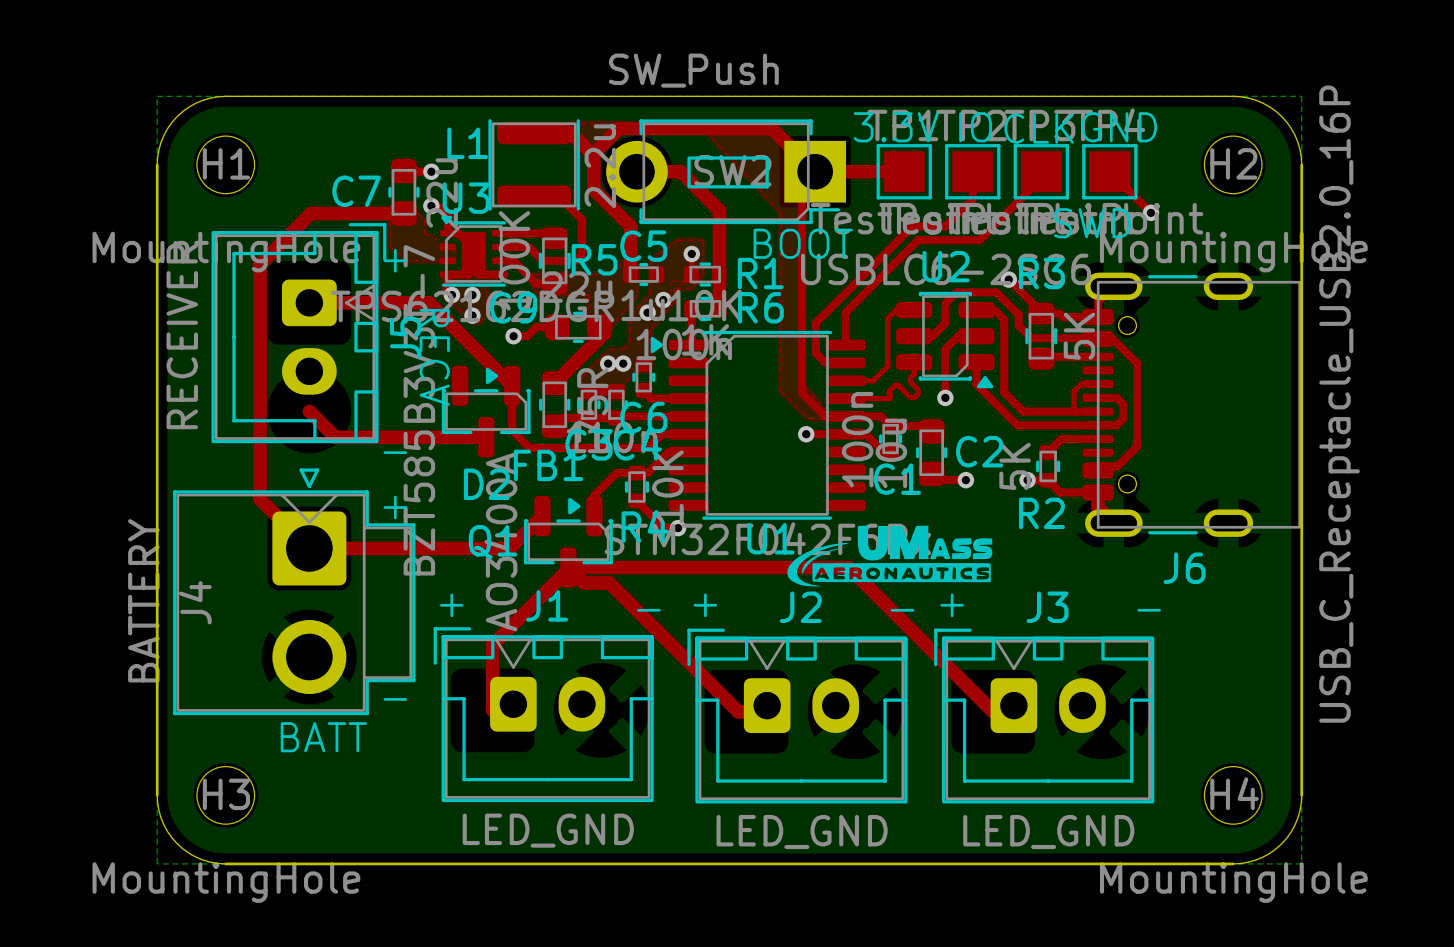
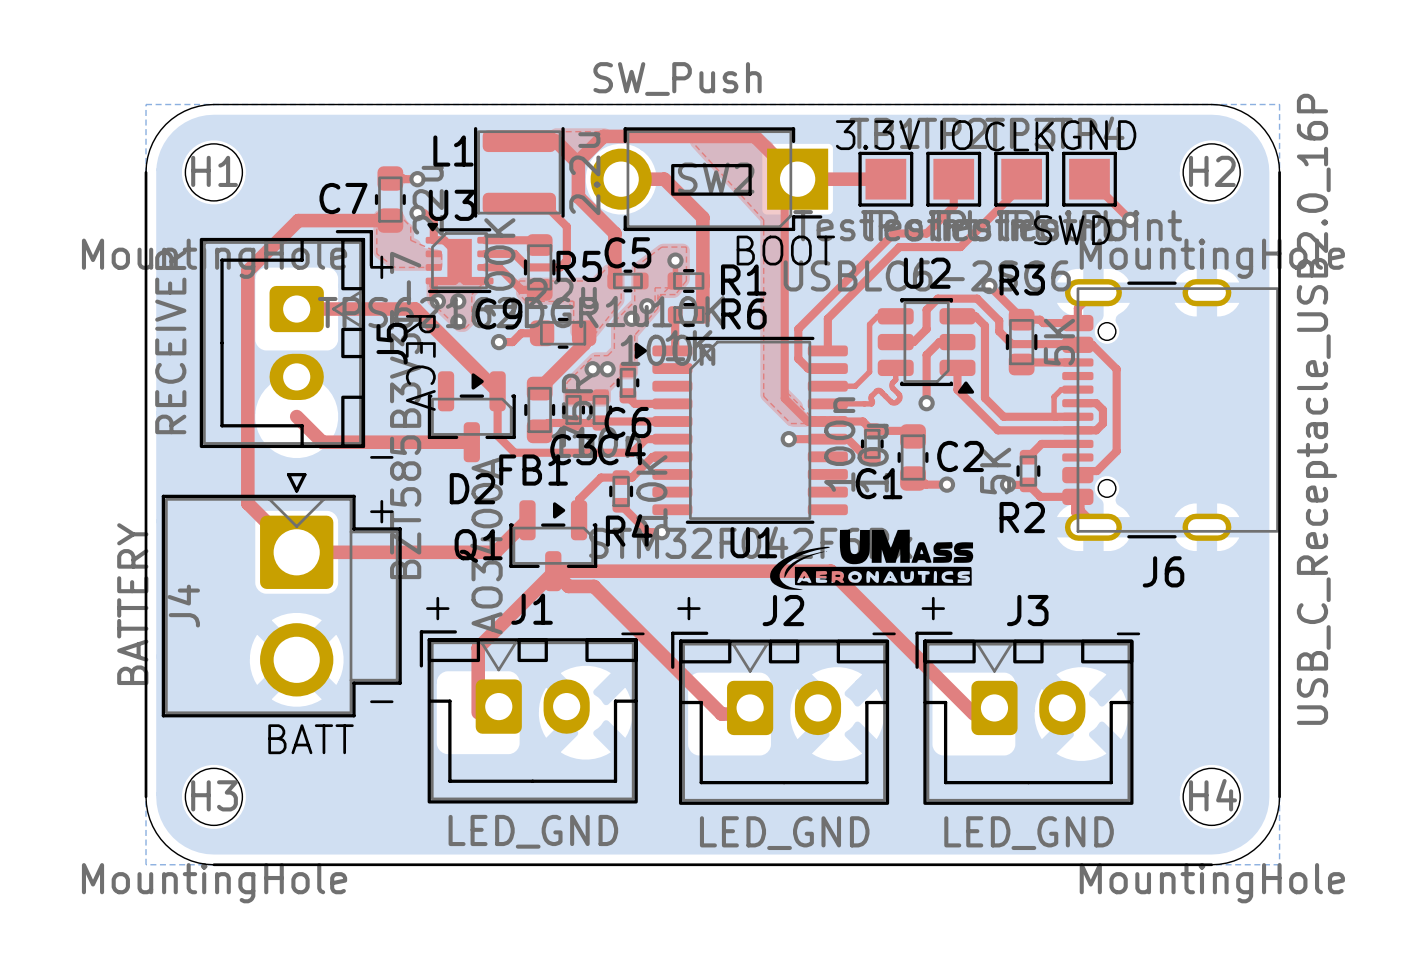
text position: - (648, 610) -> - (632, 633)
text position: - (902, 610) -> - (884, 633)
text position: - (1149, 610) -> - (1128, 633)

